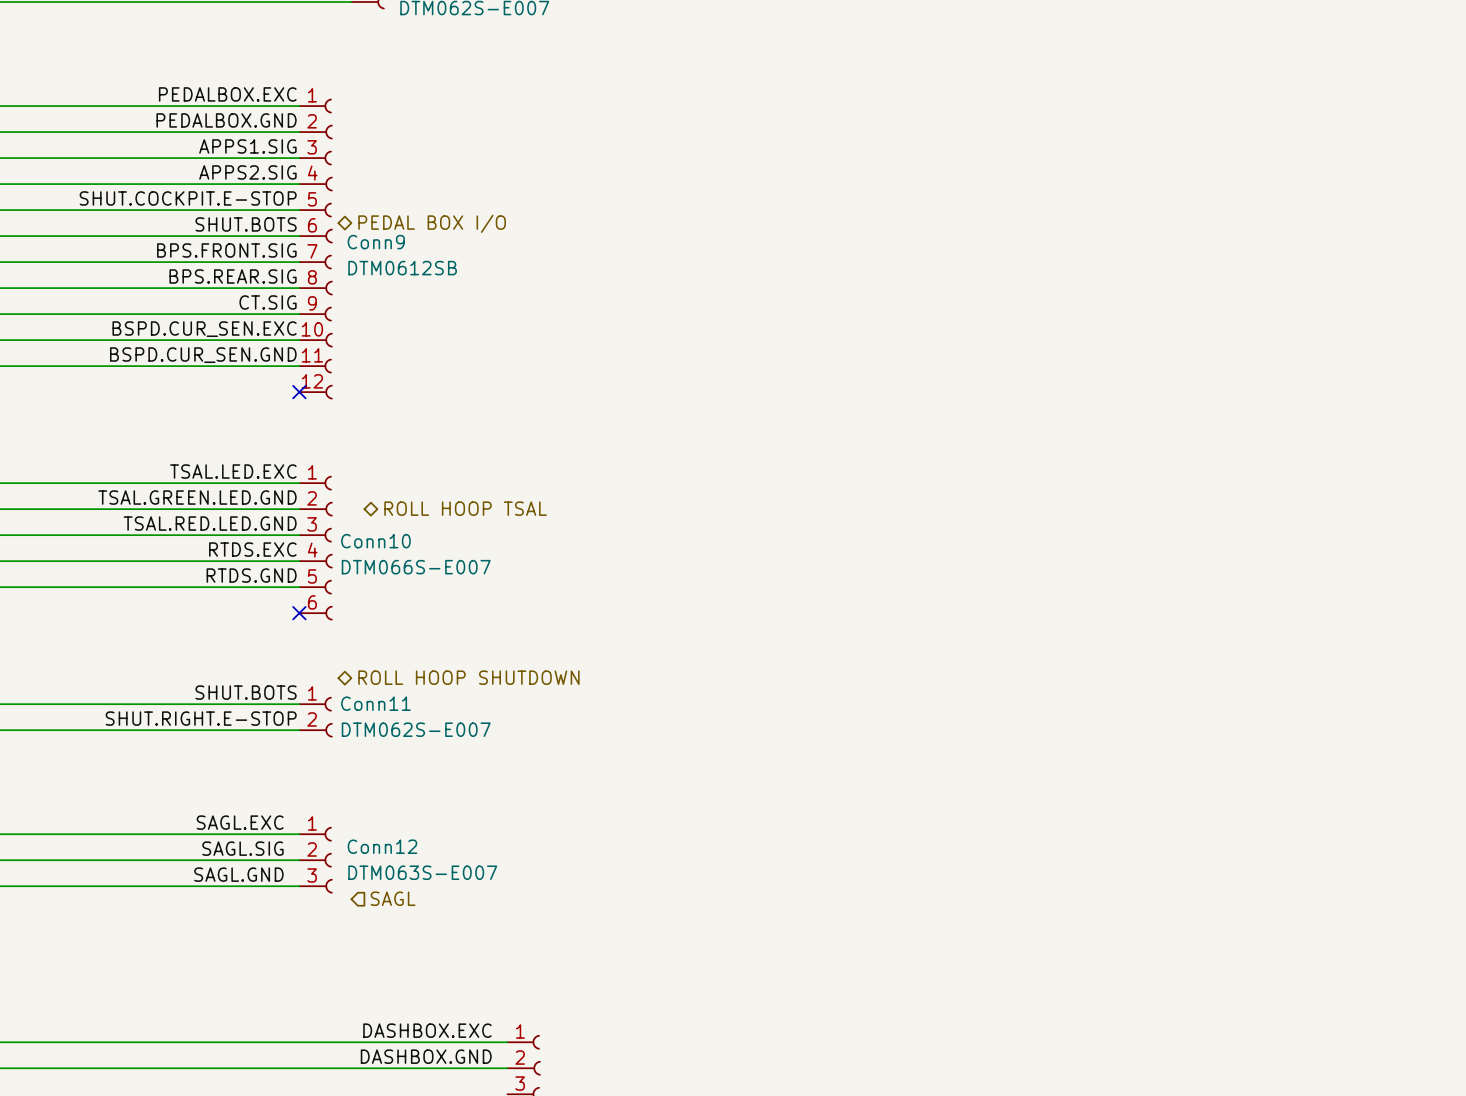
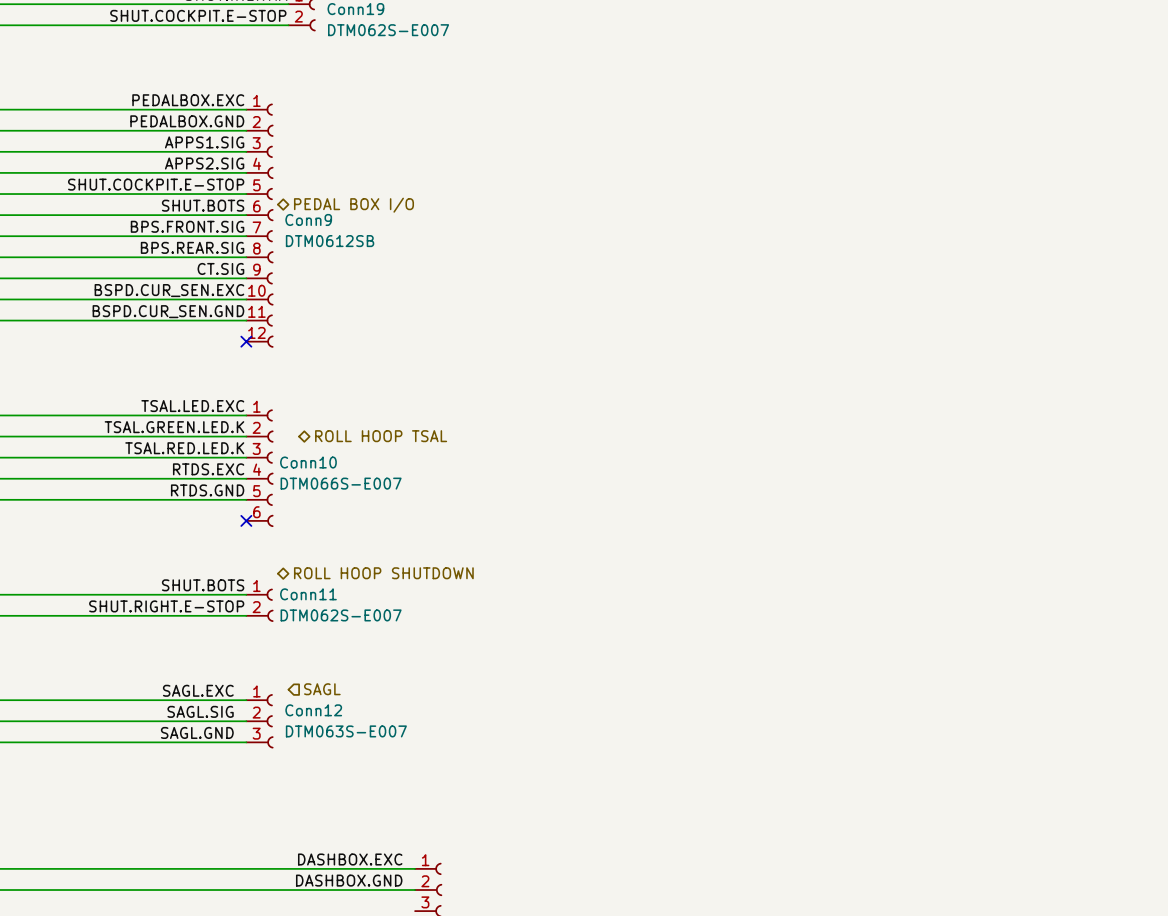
label: TSAL.GREEN.LED.GND (197, 497) -> TSAL.GREEN.LED.K (174, 427)
label: TSAL.RED.LED.GND (210, 523) -> TSAL.RED.LED.K (184, 448)
hierarchical label position: SAGL (393, 898) -> SAGL (322, 689)

